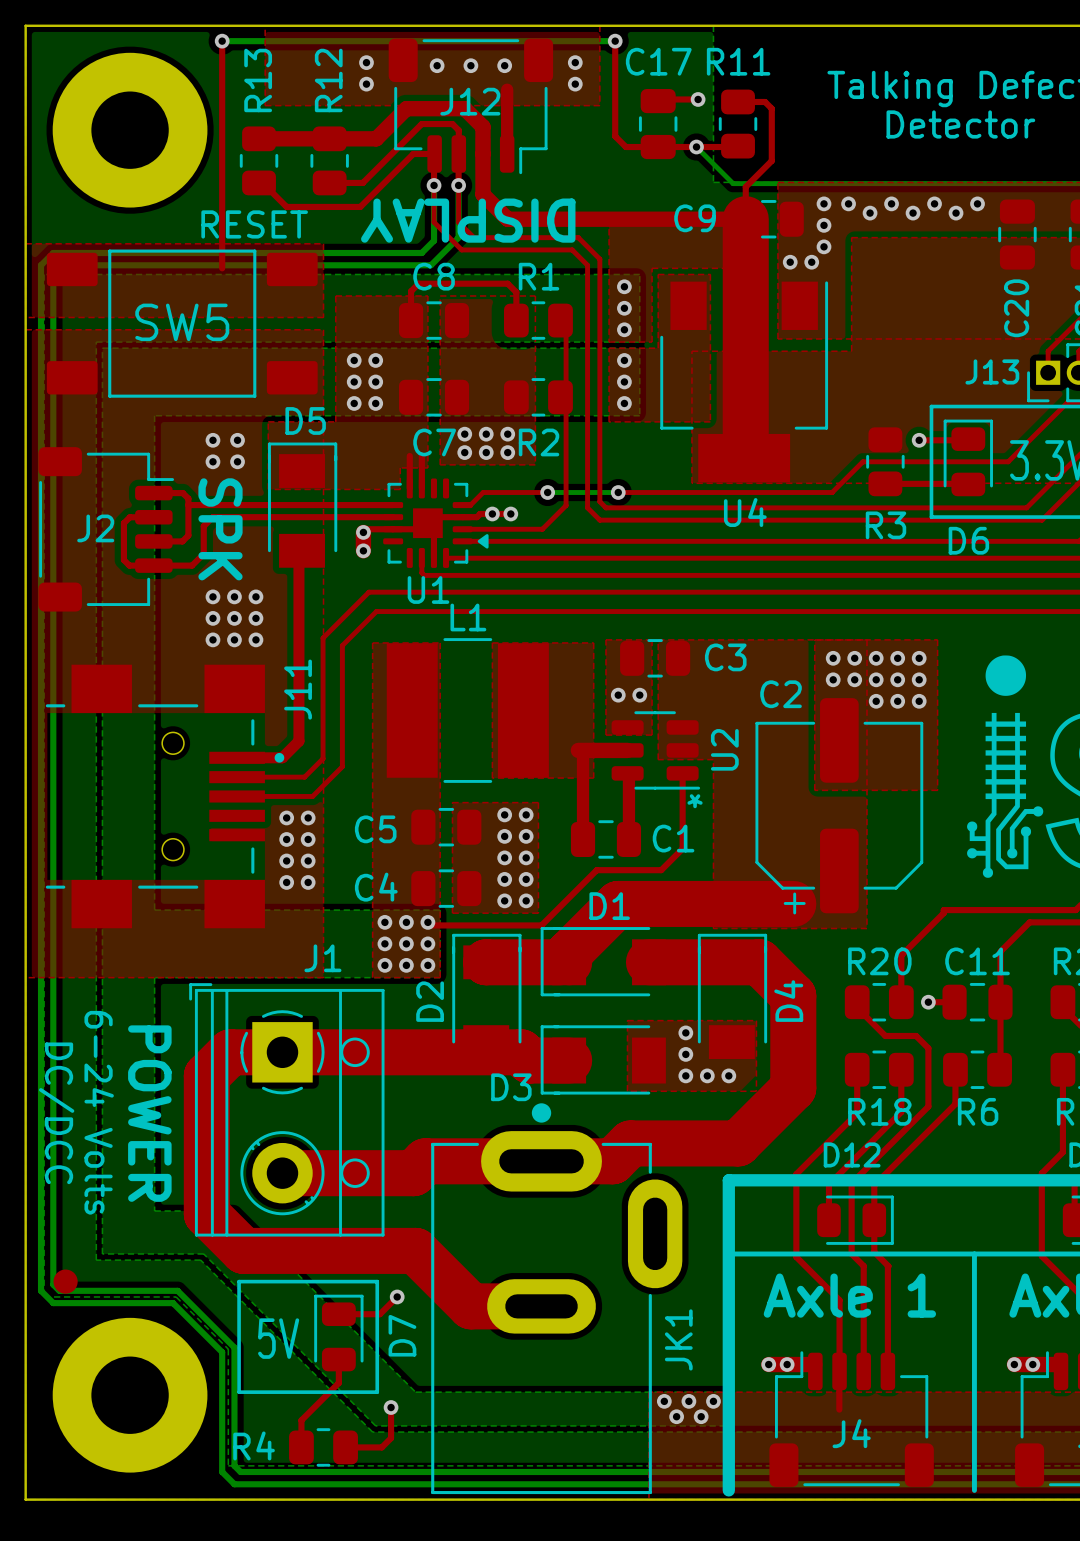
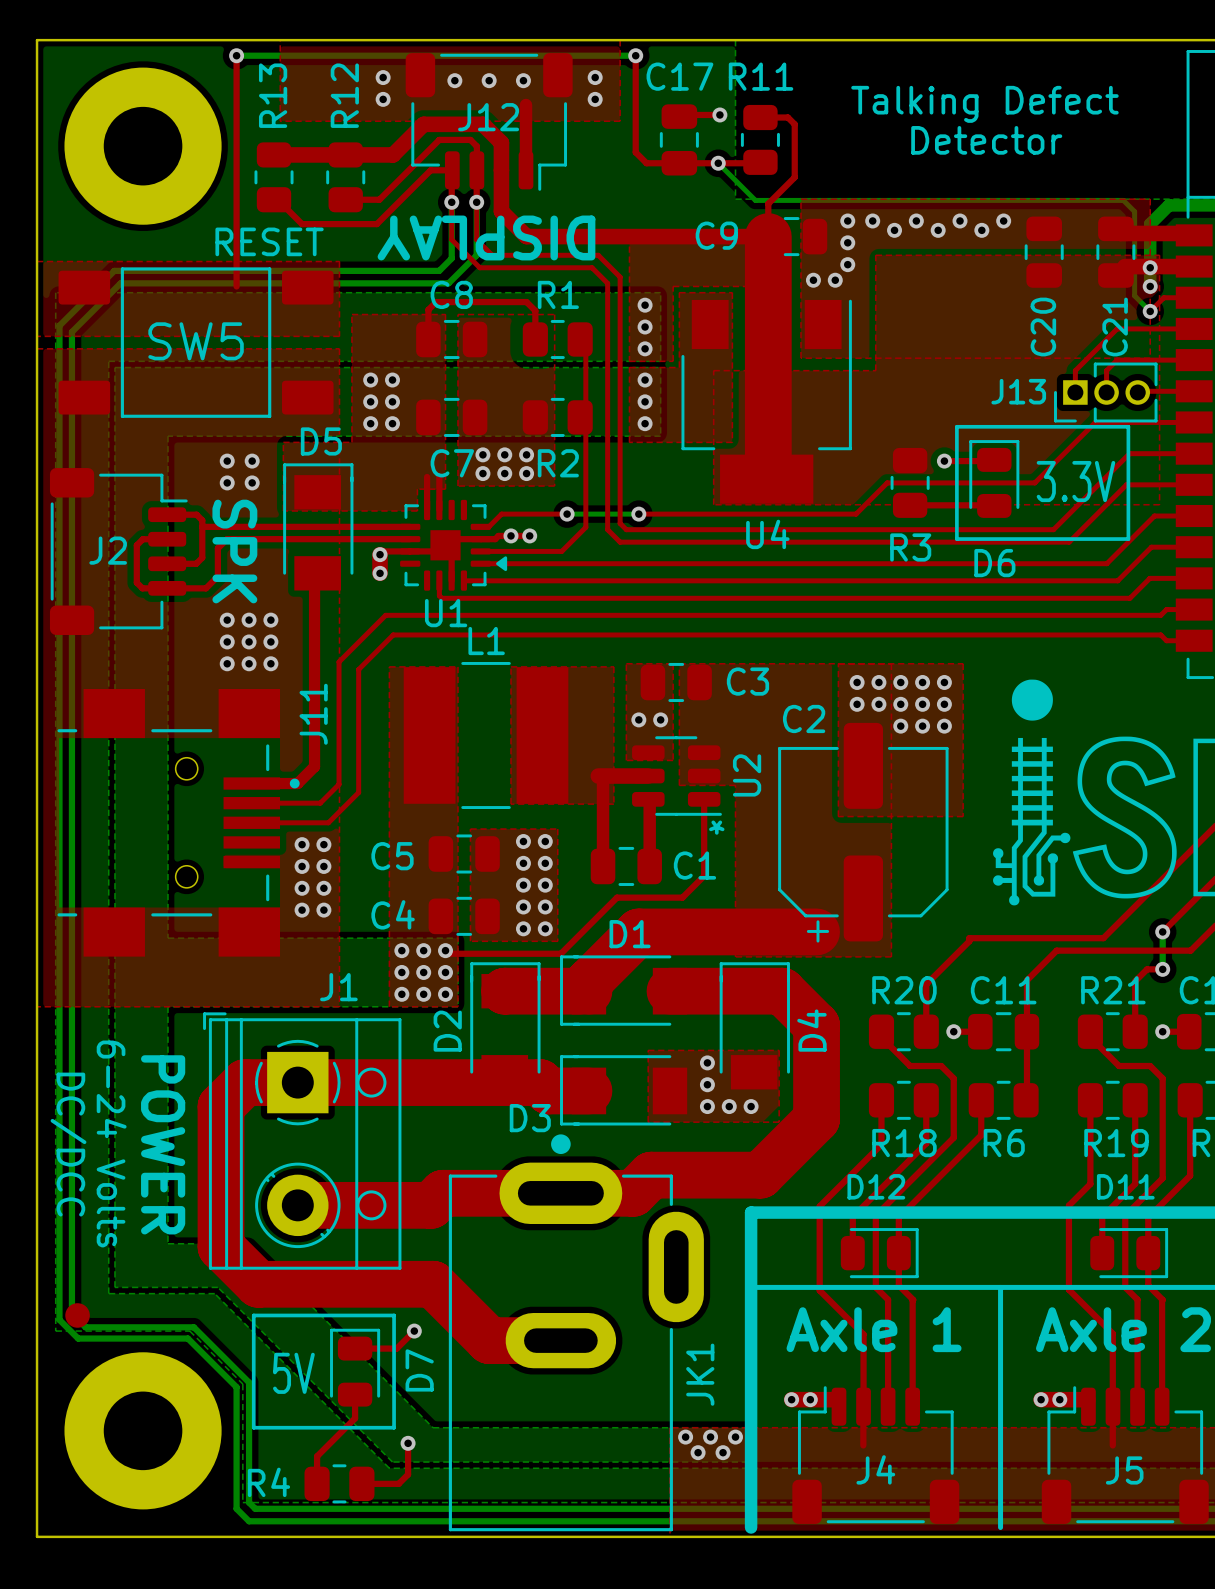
bottom track: (101, 253) (53, 253) (41, 265) (41, 1290) (53, 1303) (174, 1304) -> (114, 270) (59, 325) (59, 1319) (78, 1338) (187, 1338)
bottom track: (107, 265) (62, 265) (53, 274) (53, 1284) (59, 1290) (177, 1290) (180, 1293) -> (120, 283) (71, 332) (71, 1313) (85, 1327) (193, 1327)

